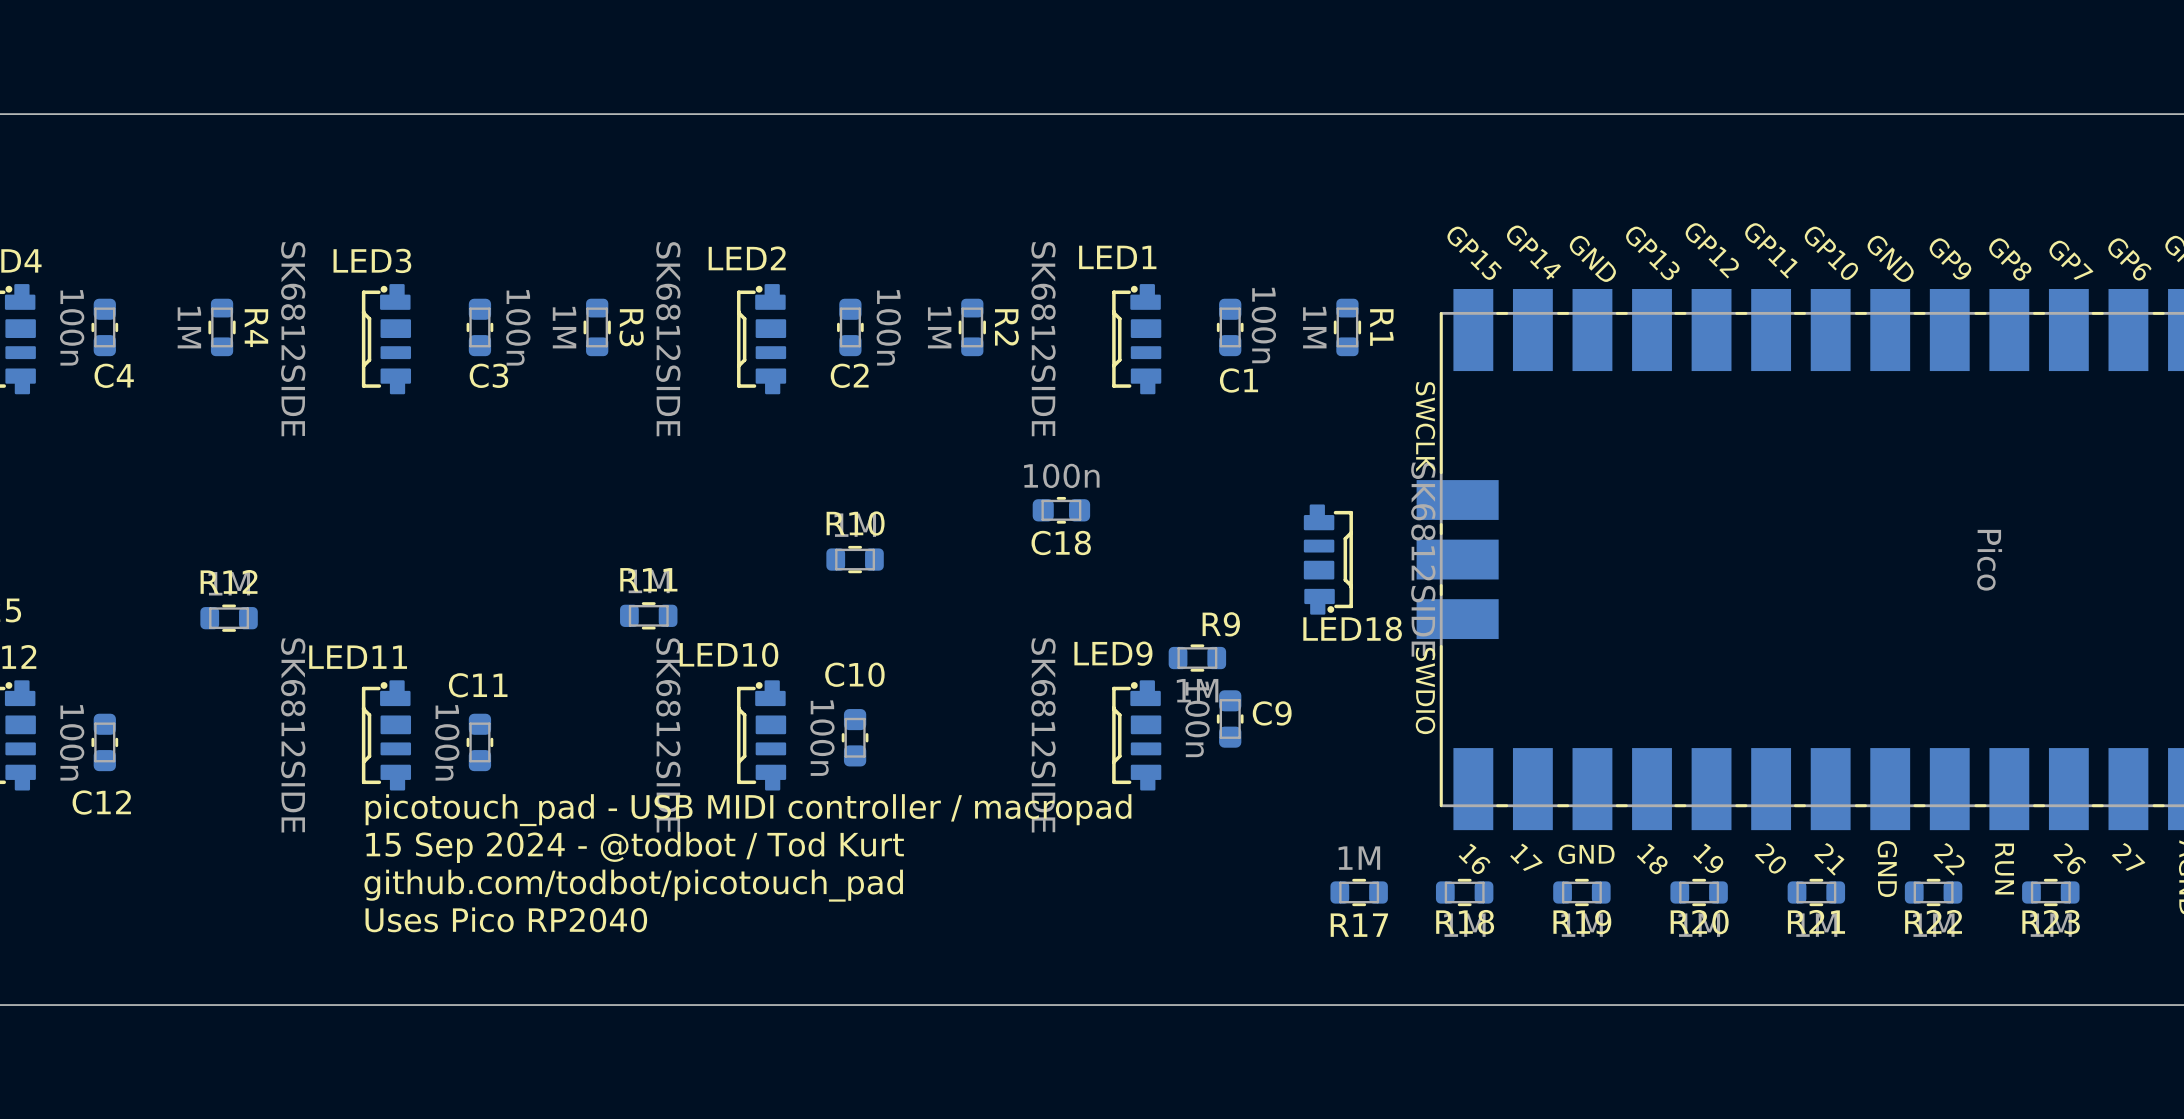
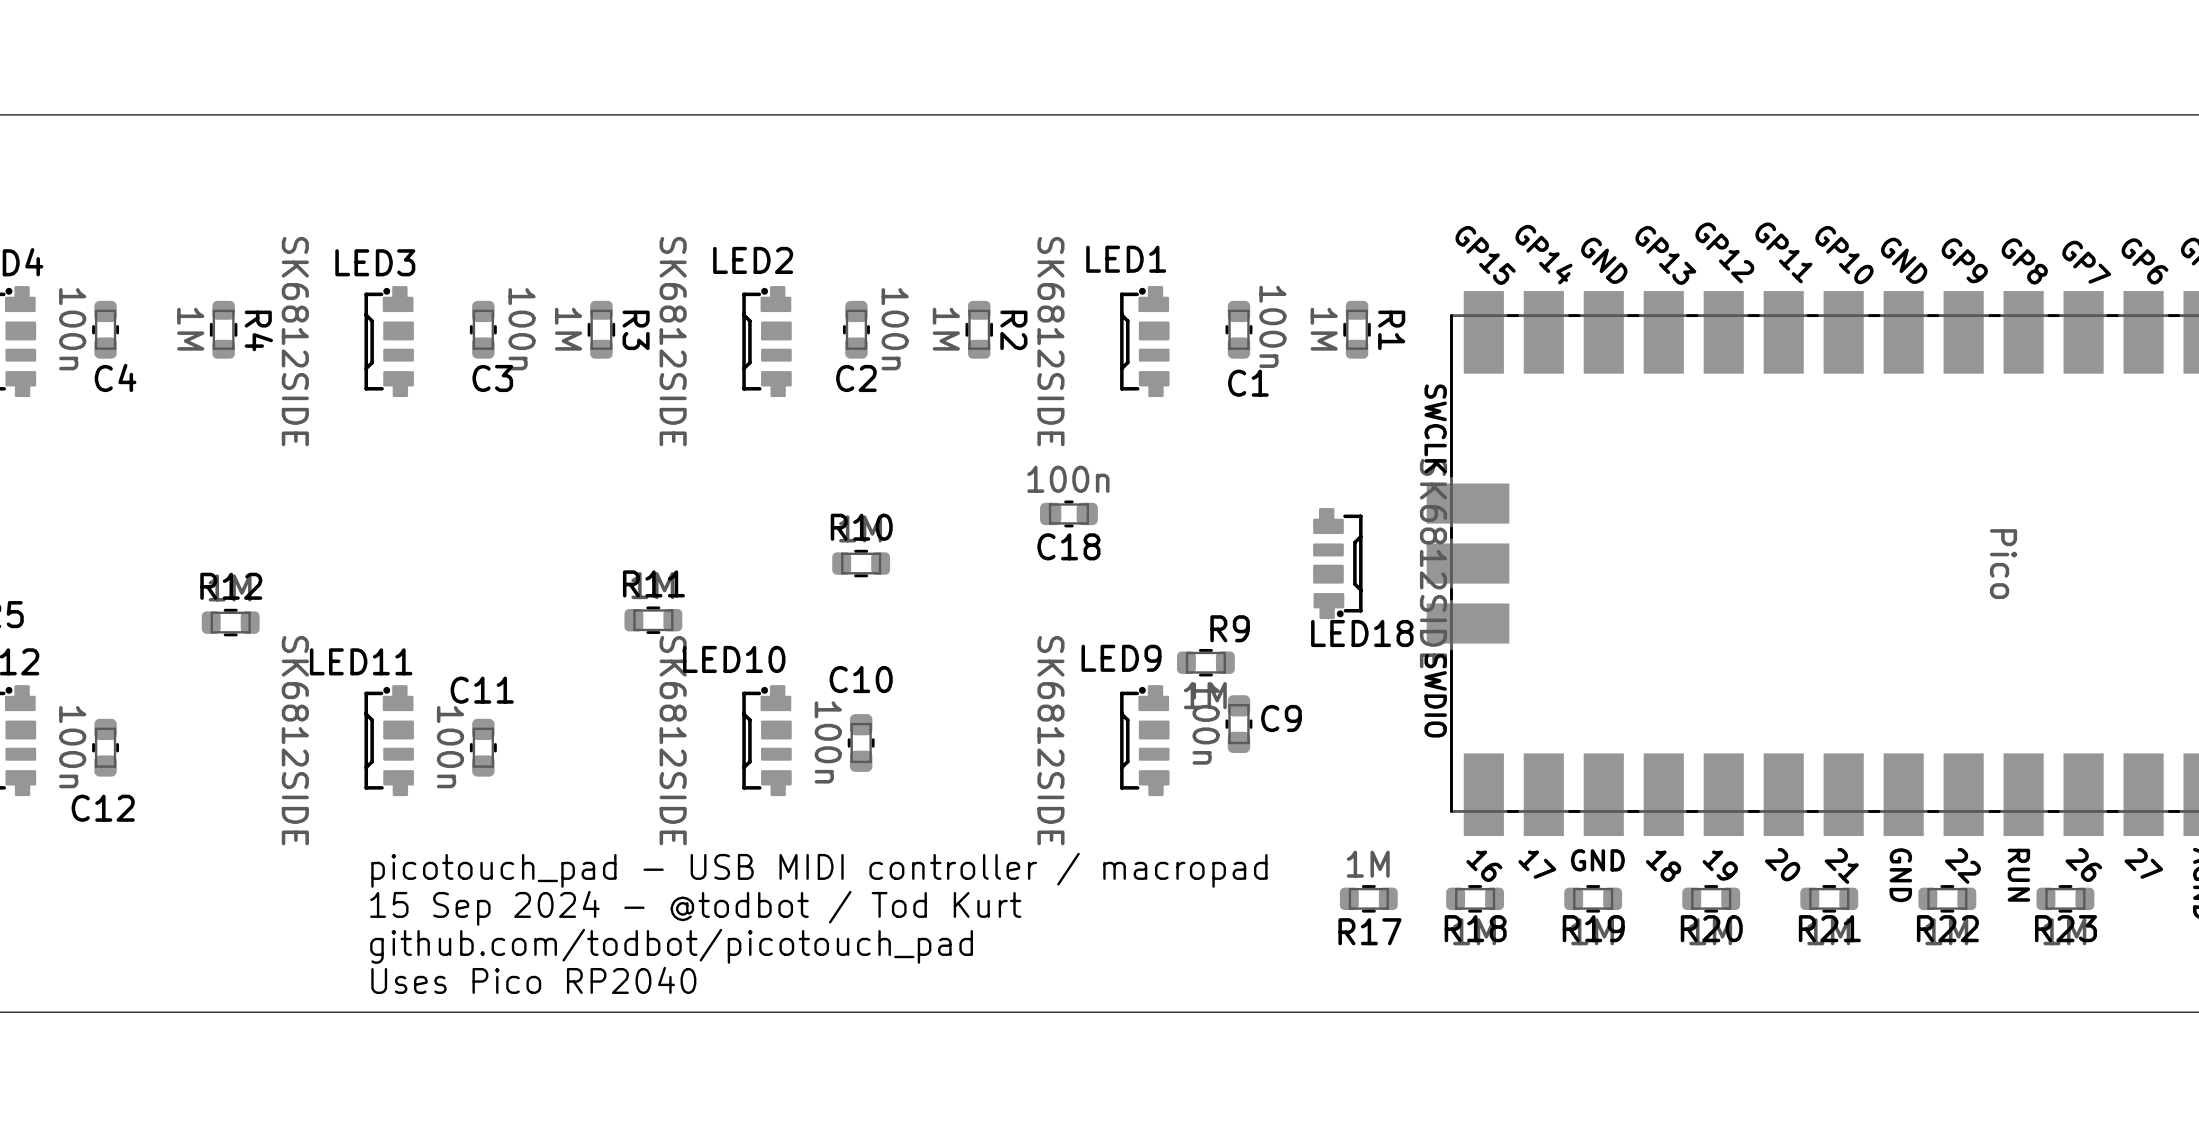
text position: picotouch_pad - USB MIDI controller / macropad (748, 810) -> picotouch_pad - USB MIDI controller / macropad (819, 870)
text position: 15 Sep 2024 - @todbot / Tod Kurt (635, 847) -> 15 Sep 2024 - @todbot / Tod Kurt (695, 908)
text position: github.com/todbot/picotouch_pad (633, 885) -> github.com/todbot/picotouch_pad (671, 946)
text position: Uses Pico RP2040 (506, 919) -> Uses Pico RP2040 (533, 980)

